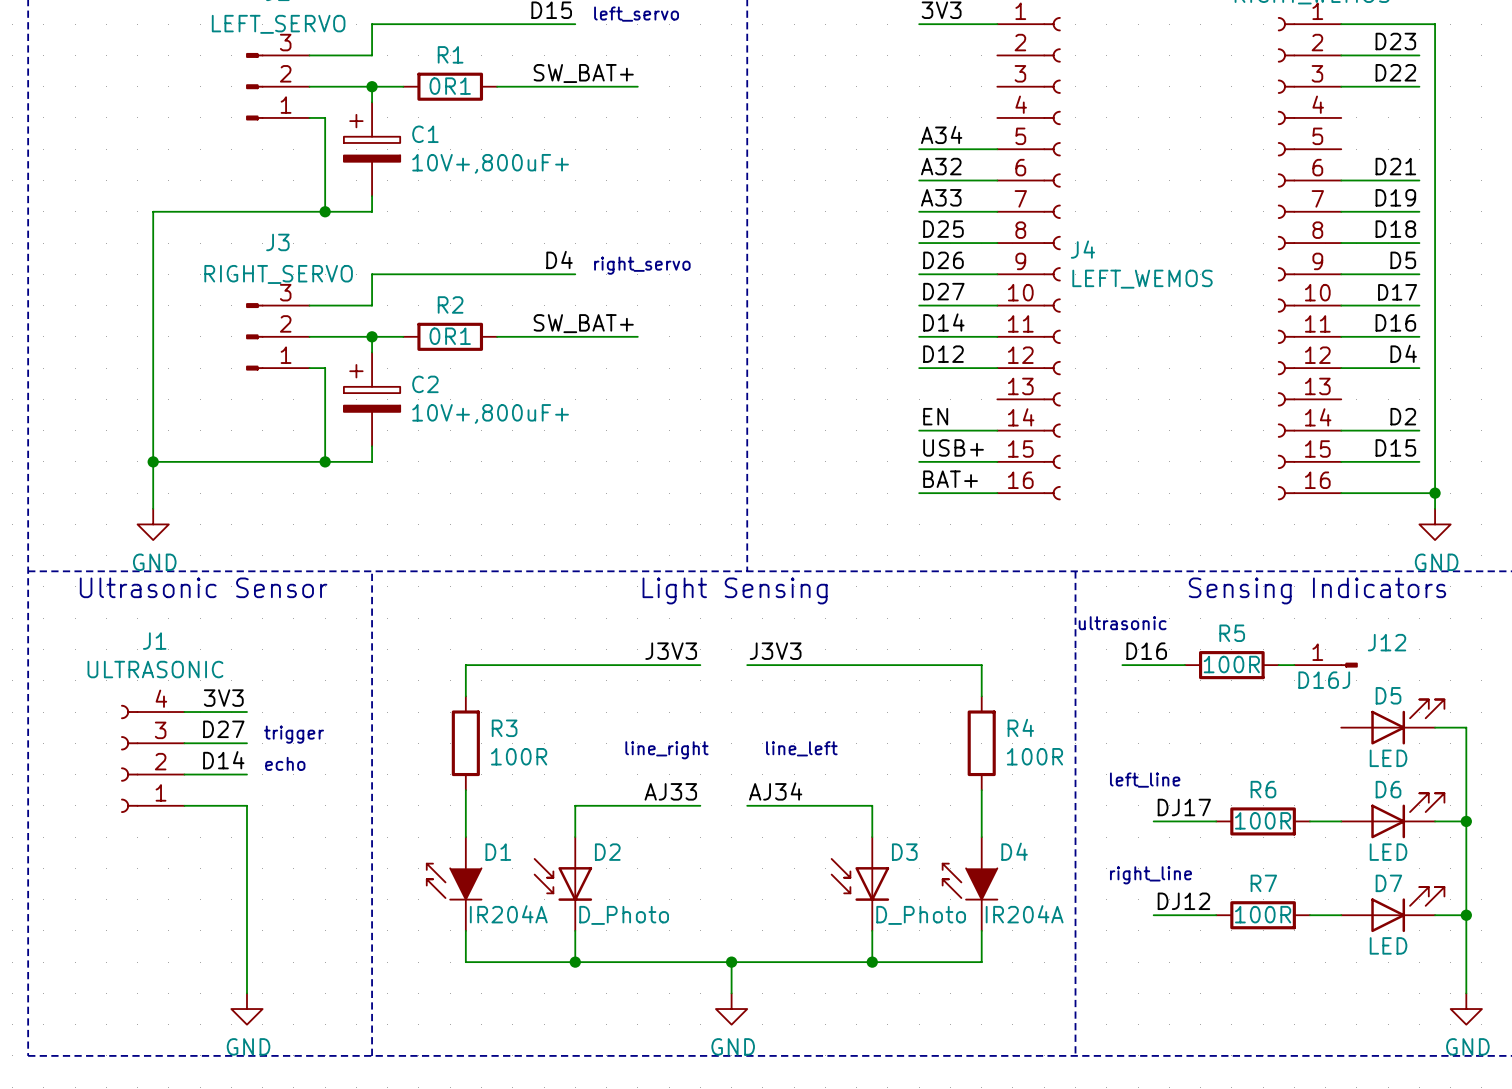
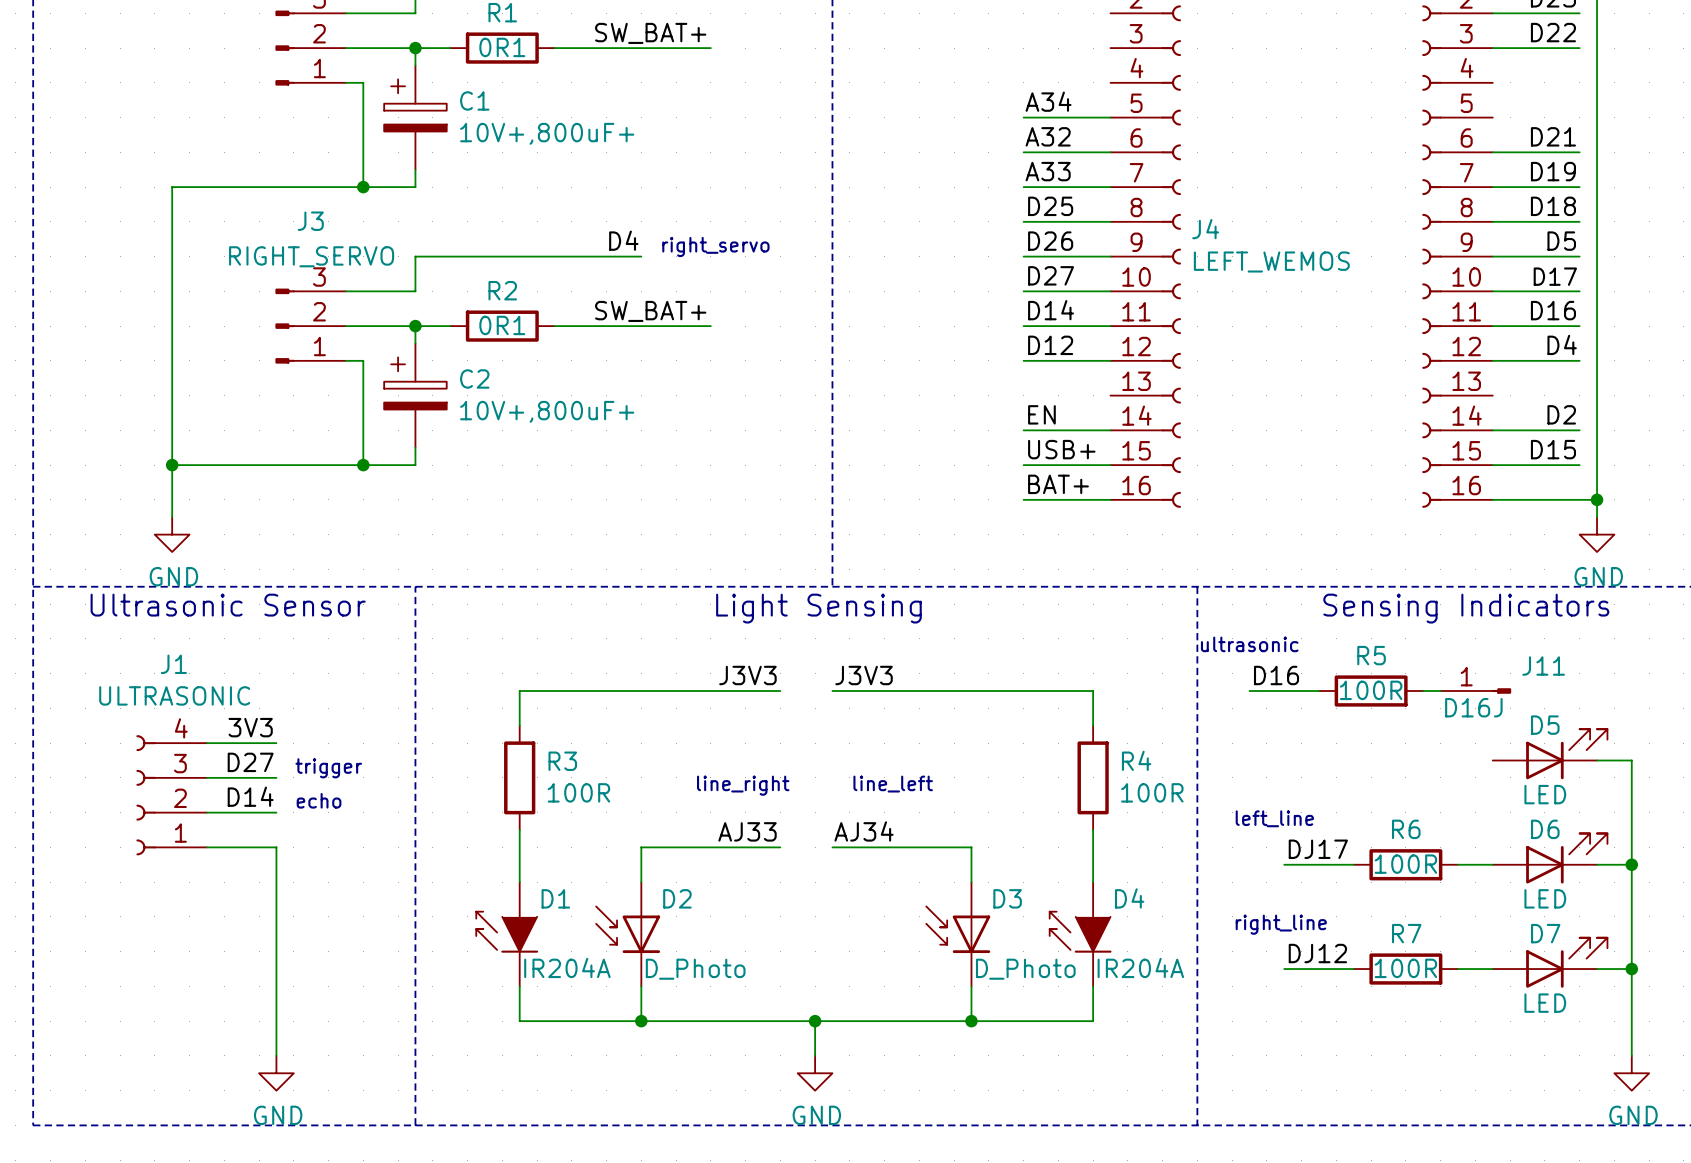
J12 name: J12 (1387, 642) -> J11 (1543, 666)

